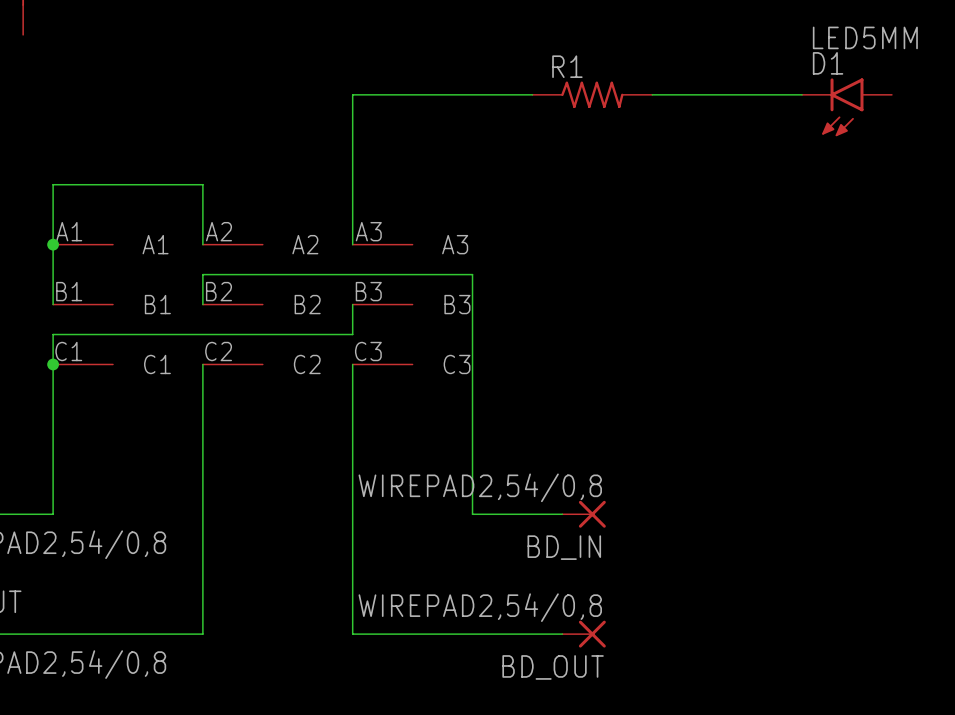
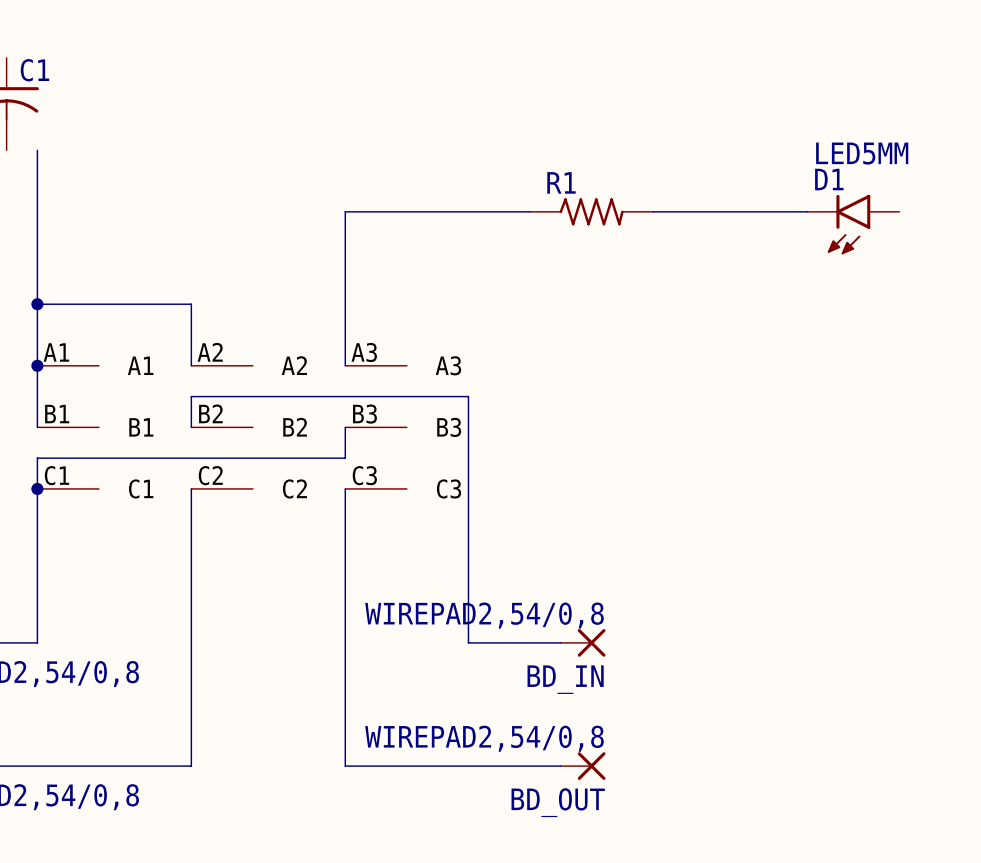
wire: none -> (37, 150) (37, 304)
junction: none -> (37, 304)

